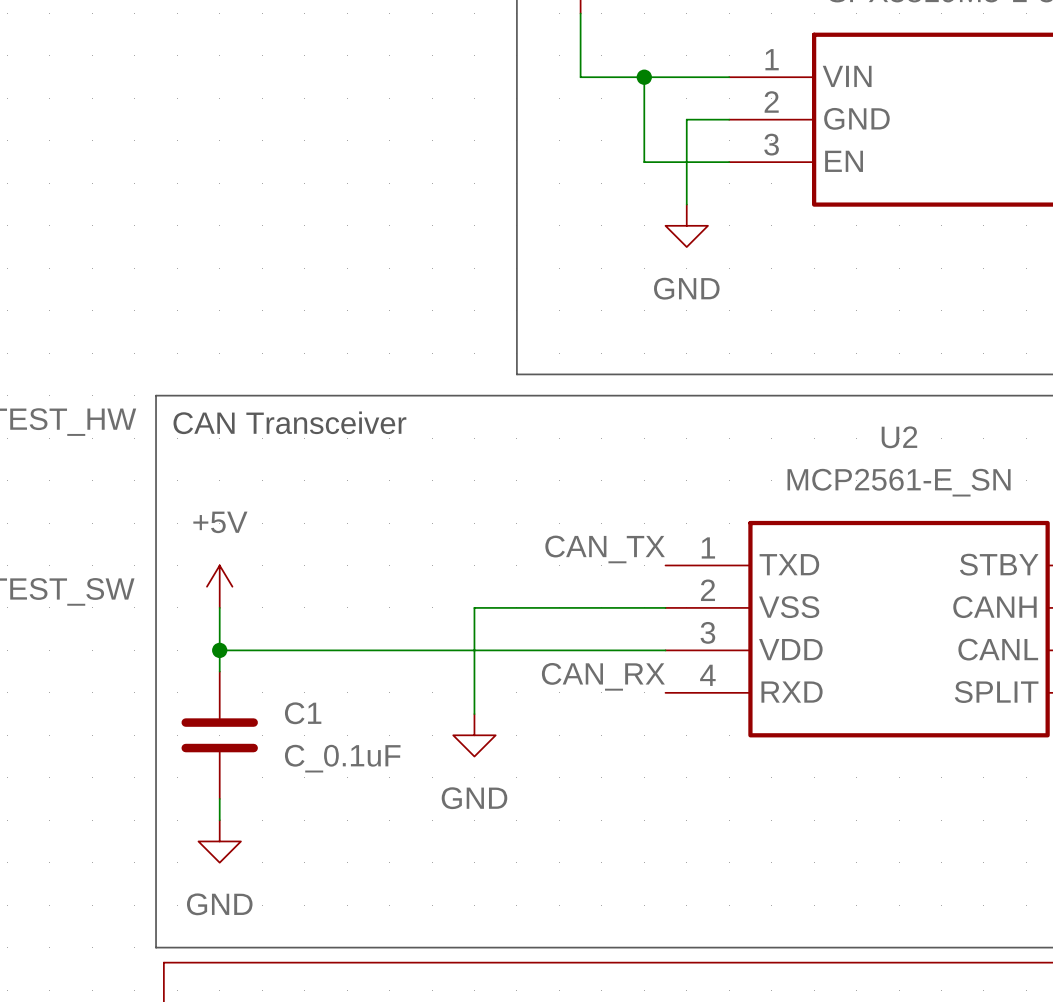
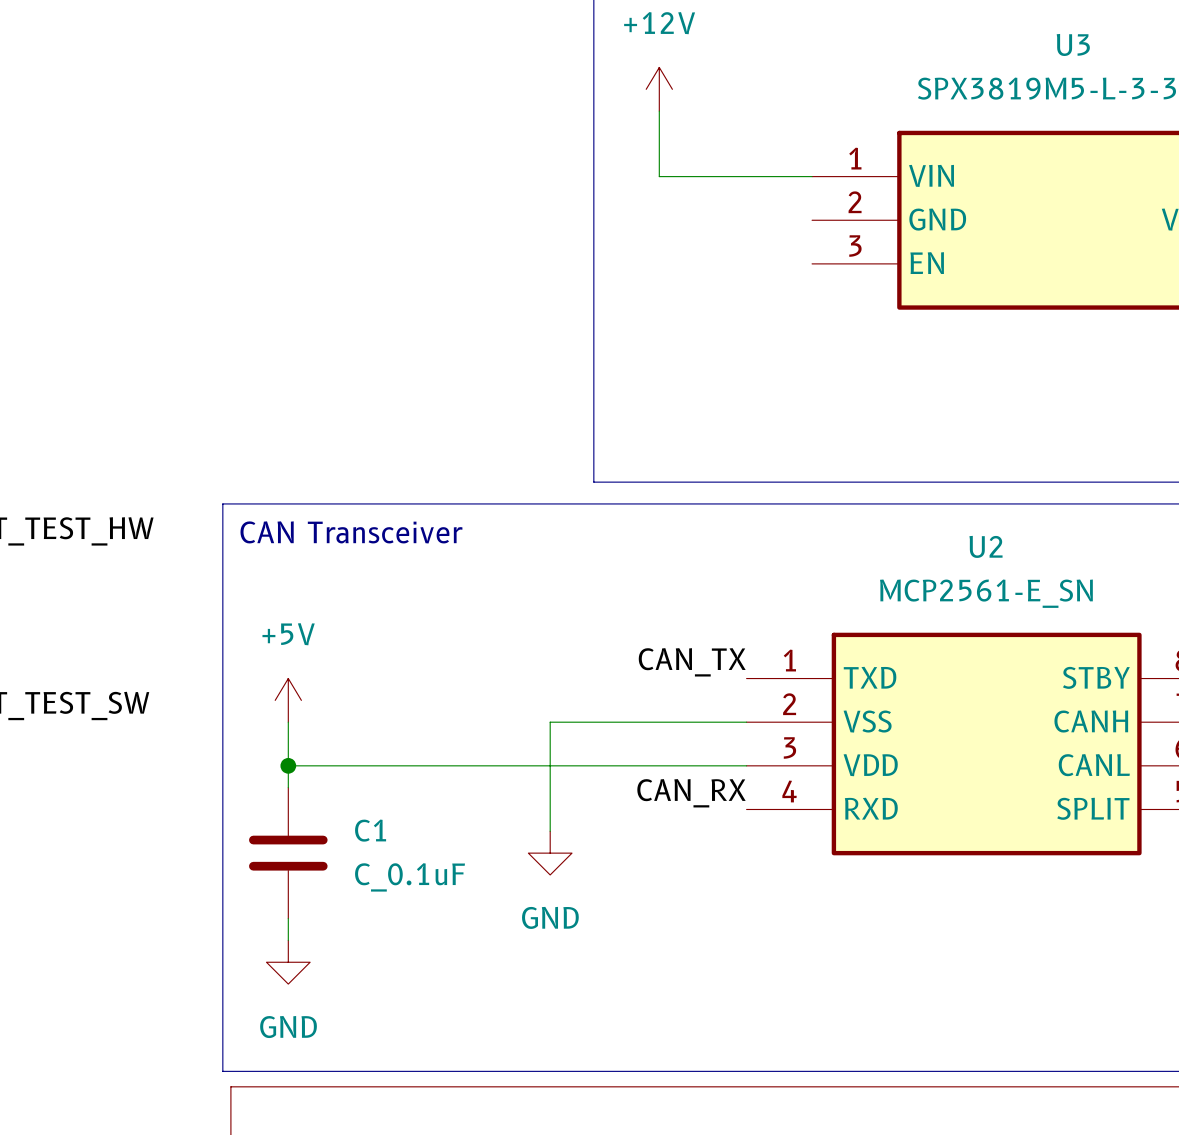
wire: (644, 77) (644, 162) (729, 162) -> none
junction: (644, 77) -> none
wire: (729, 119) (686, 119) (686, 204) -> none
power symbol: GND (686, 225) -> none

